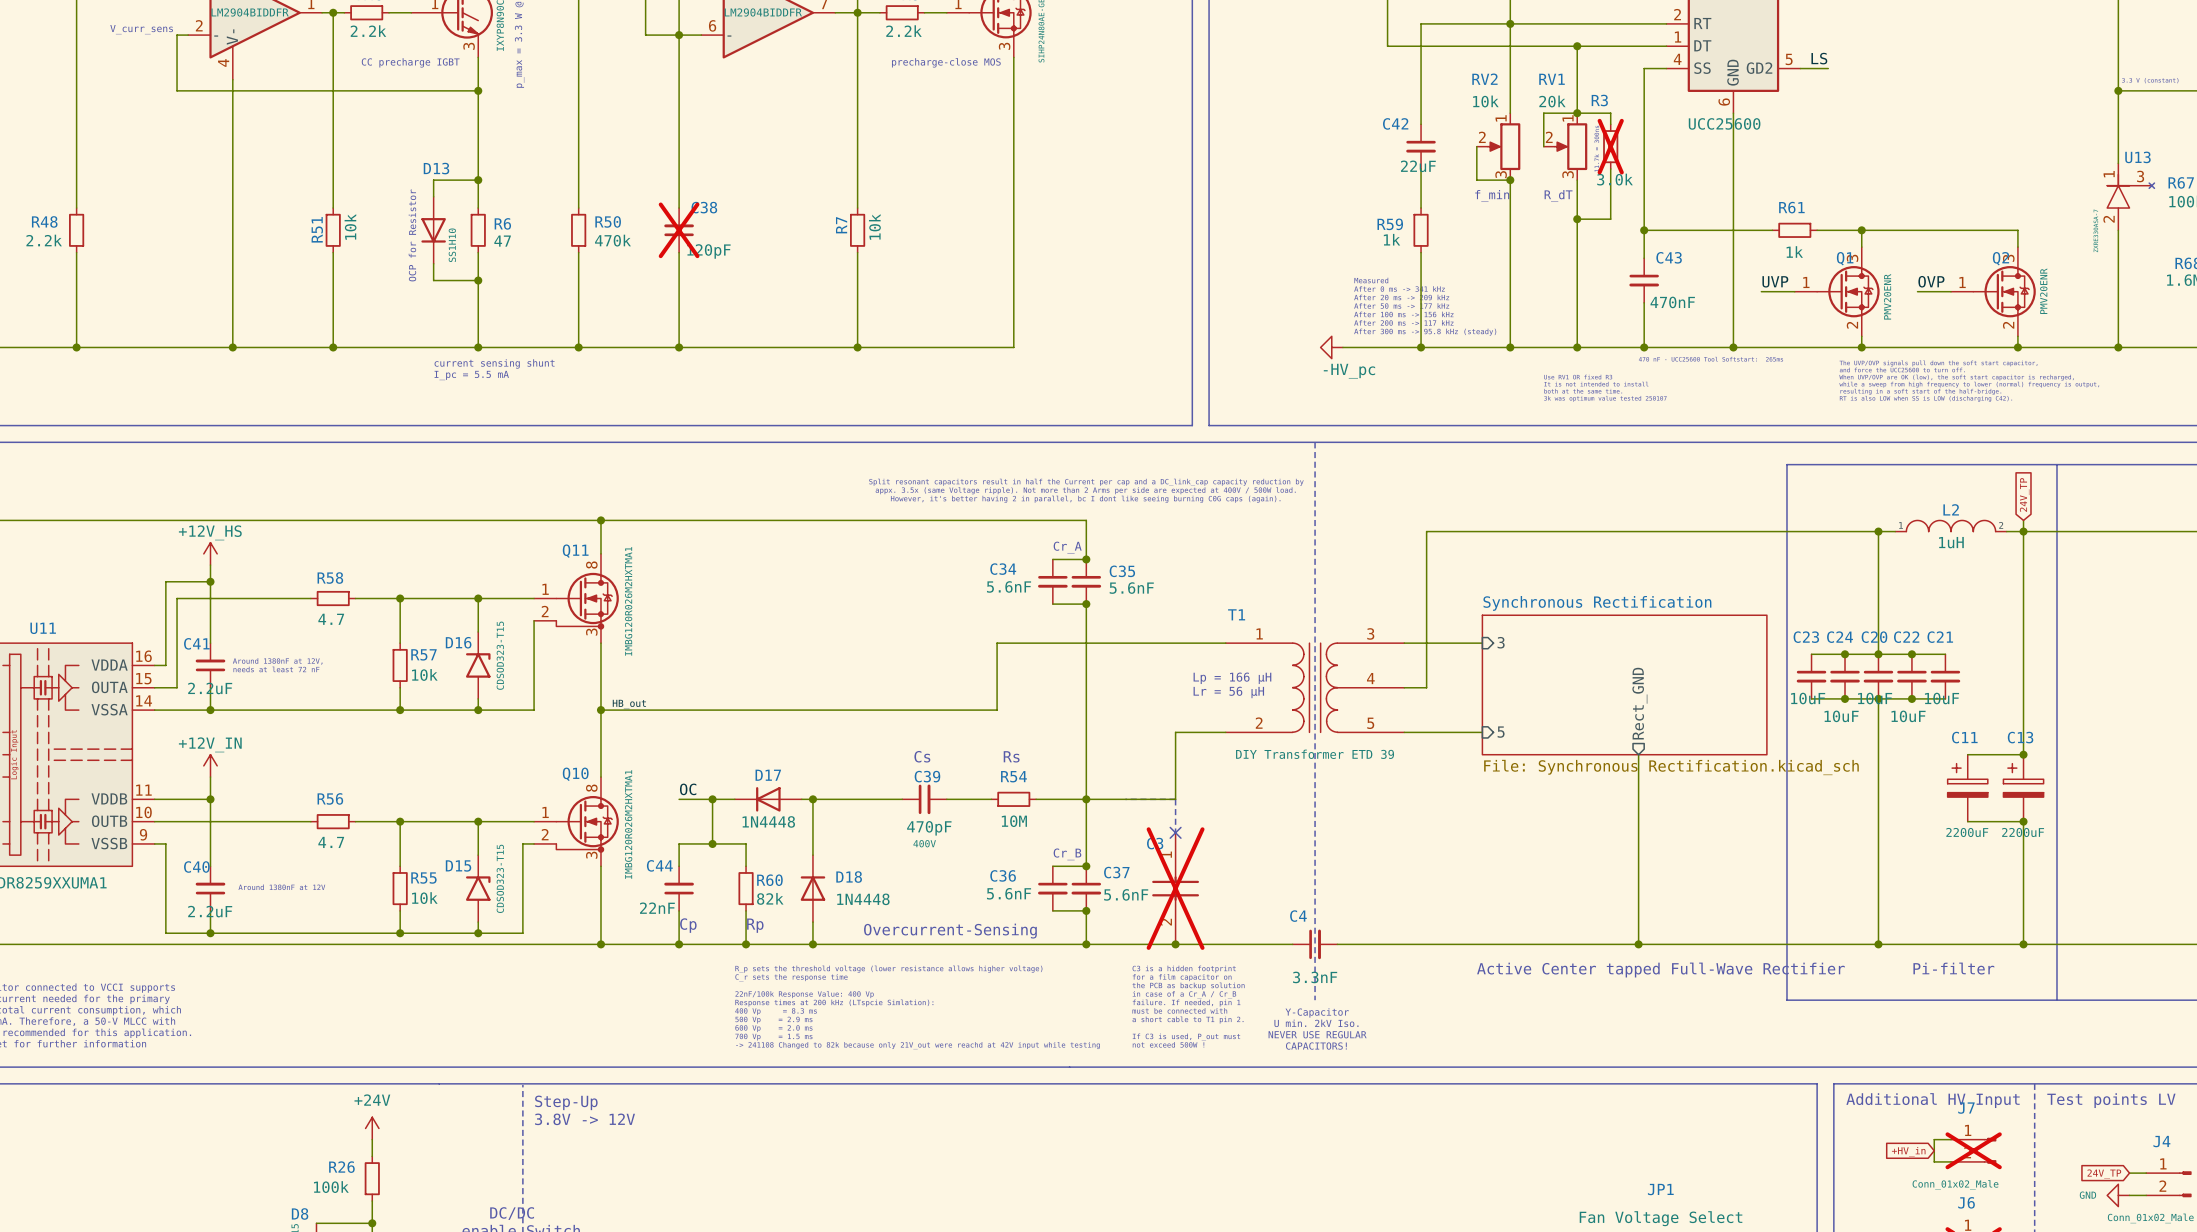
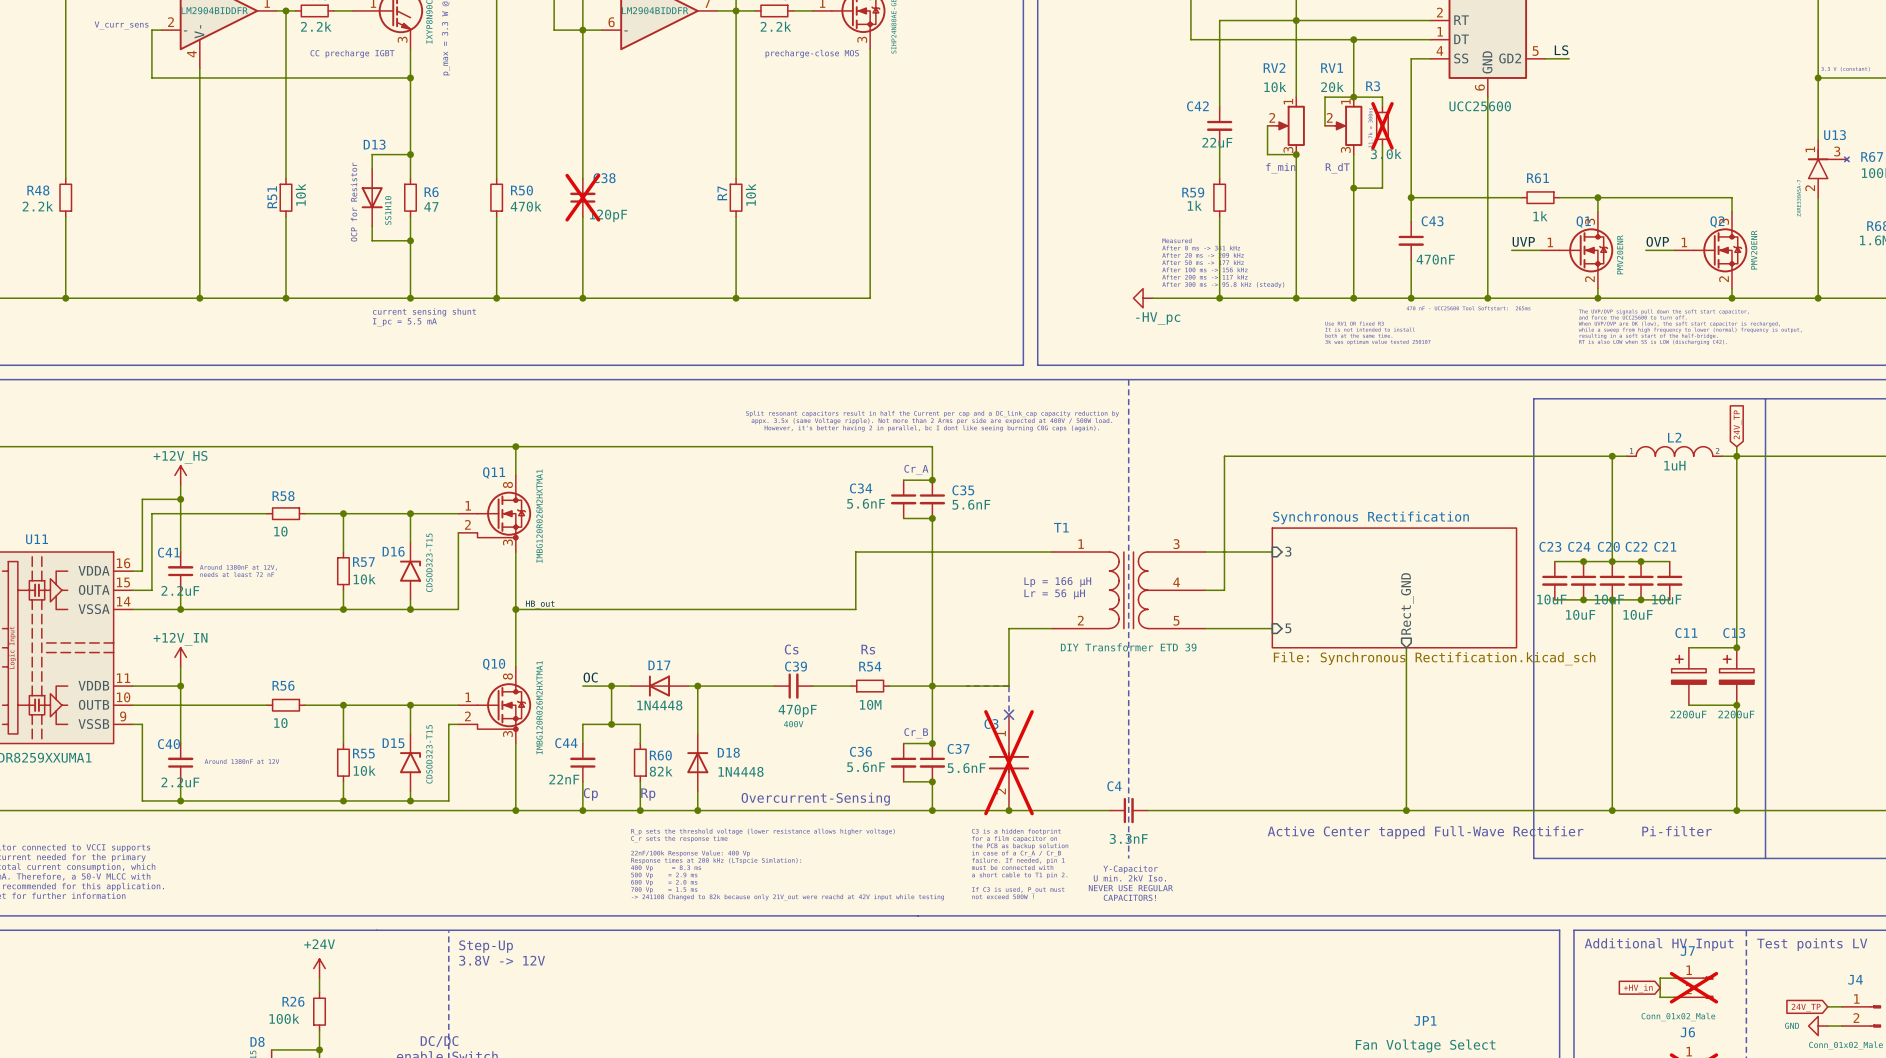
R58 value: 4.7 (331, 619) -> 10 (280, 531)
R56 value: 4.7 (331, 842) -> 10 (280, 723)

